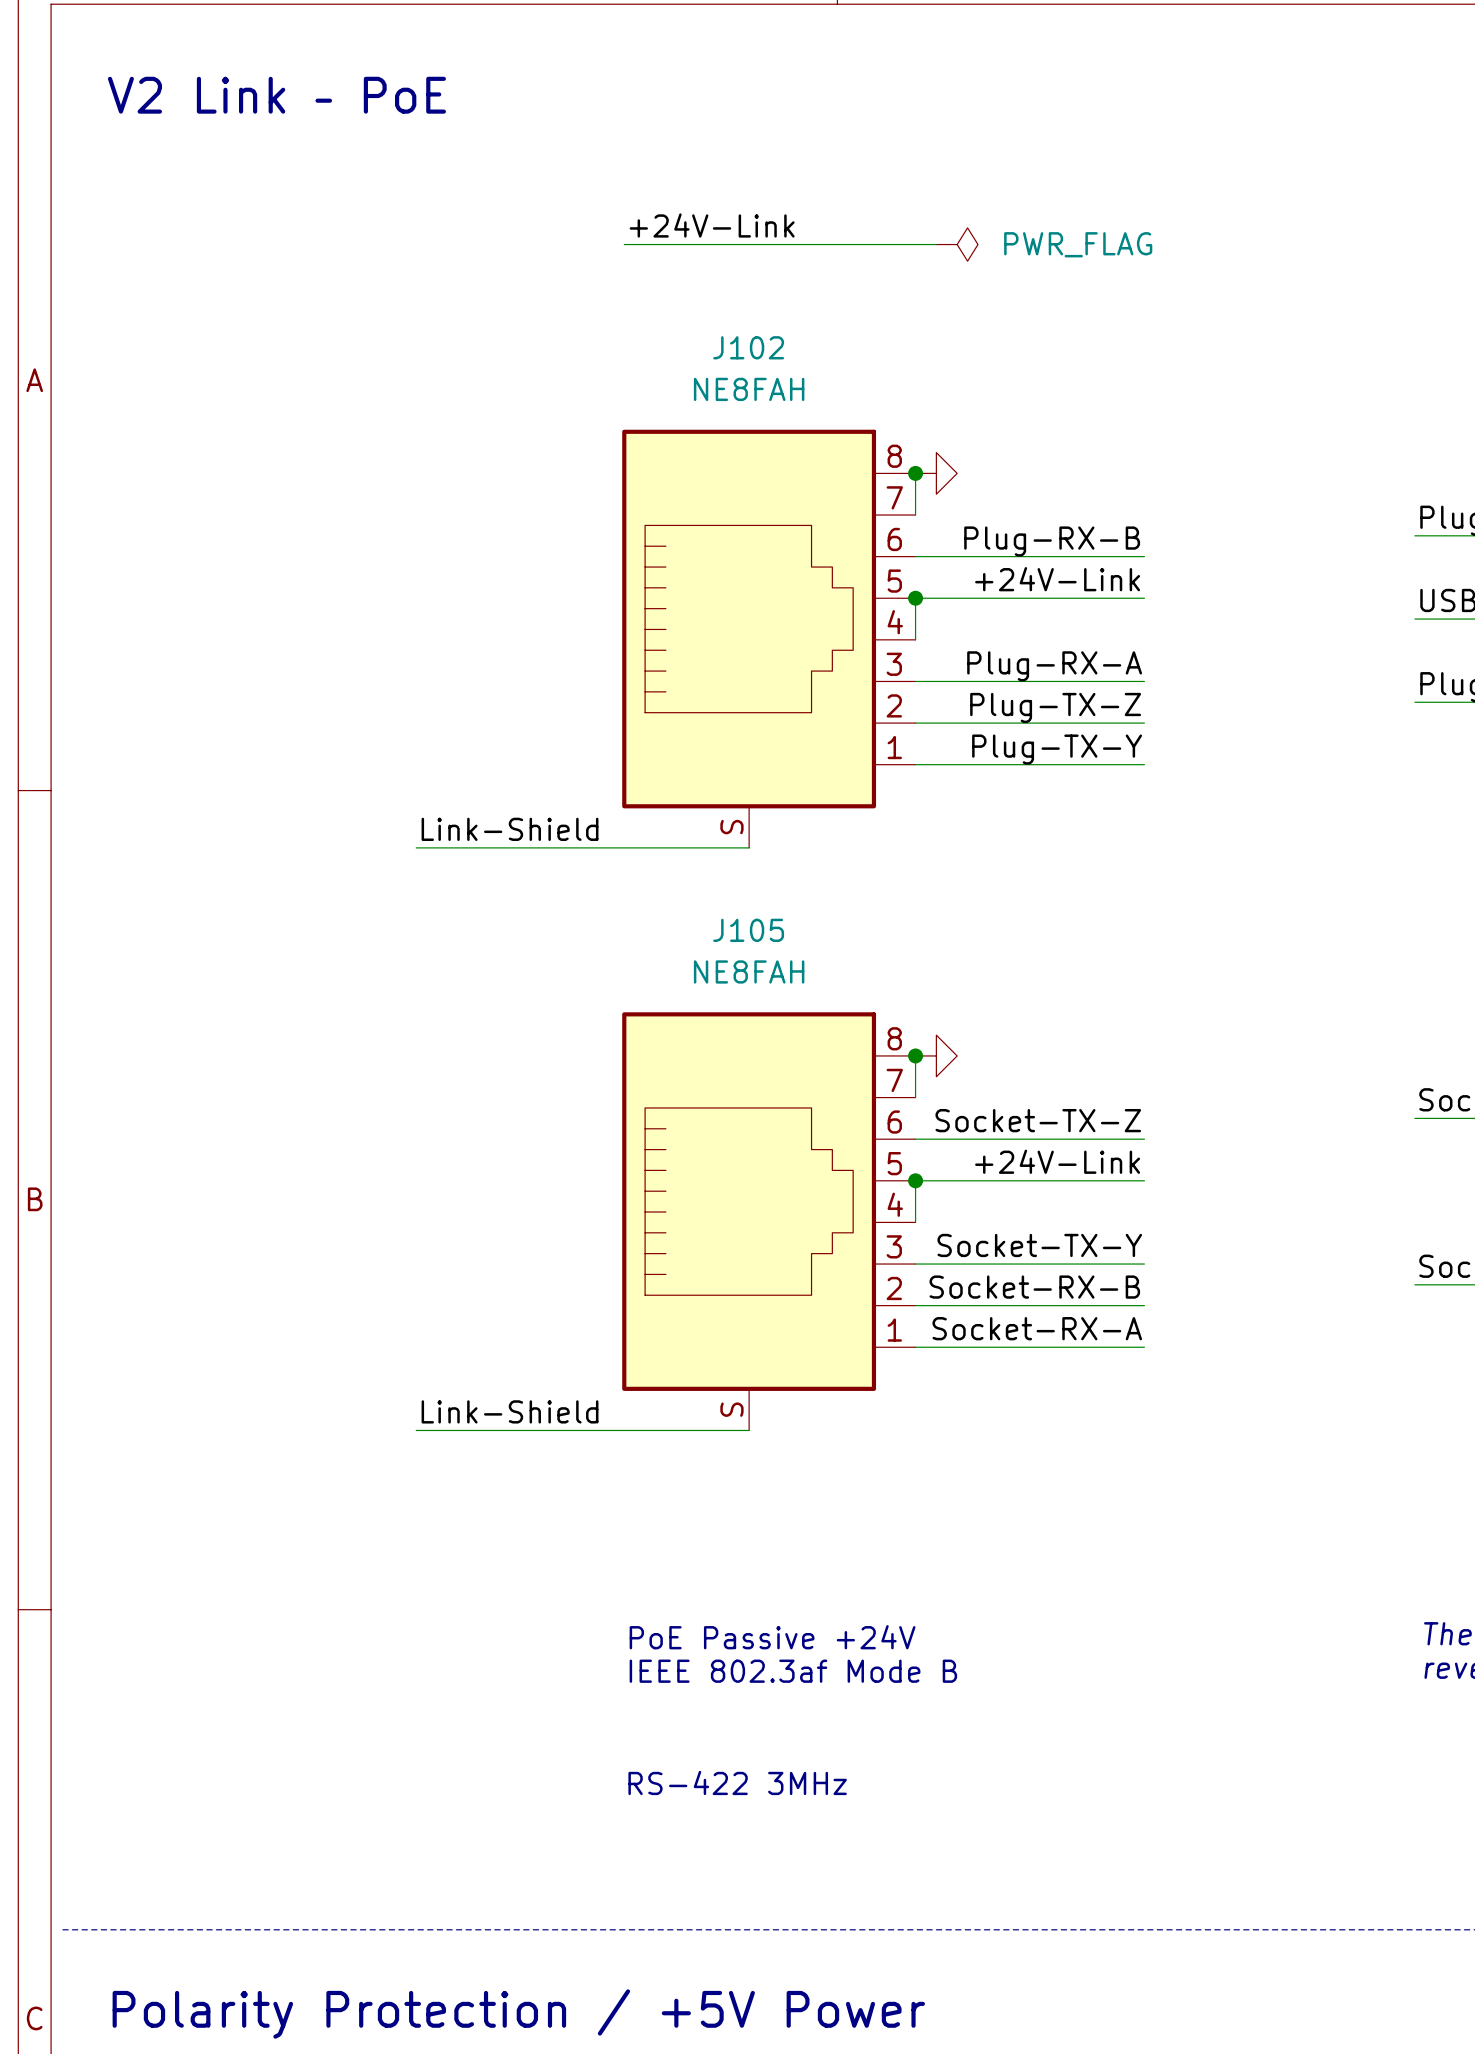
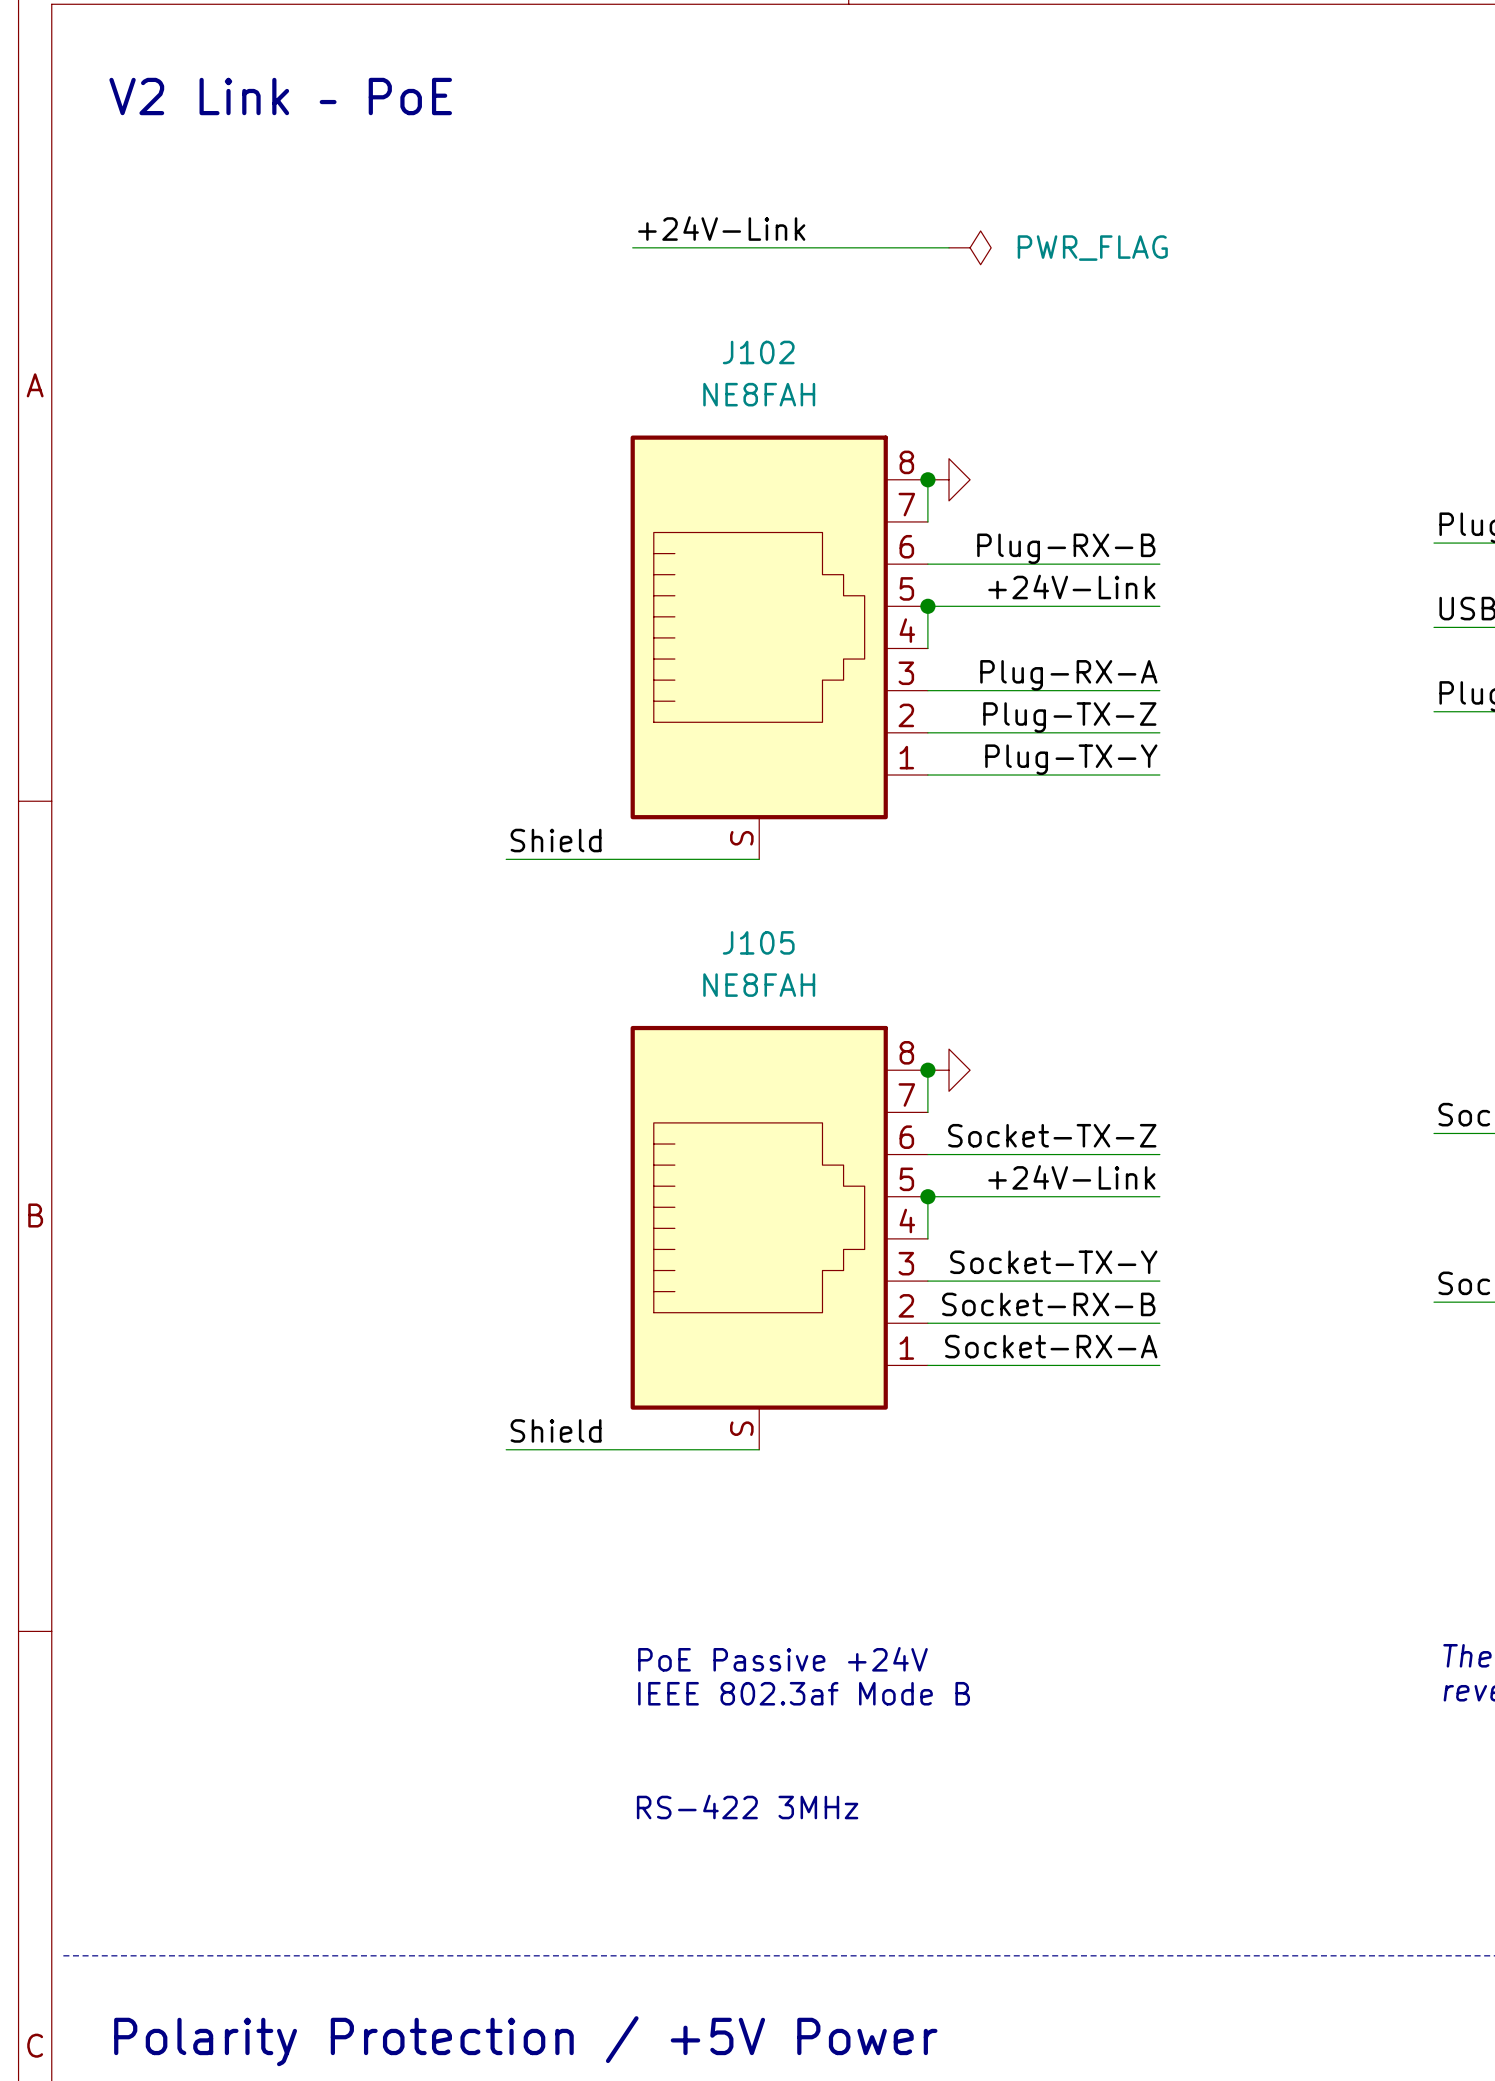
label: Link-Shield (510, 829) -> Shield (556, 840)
wire: (416, 847) (499, 847) -> none
label: Link-Shield (510, 1411) -> Shield (556, 1430)
wire: (416, 1430) (499, 1430) -> none

